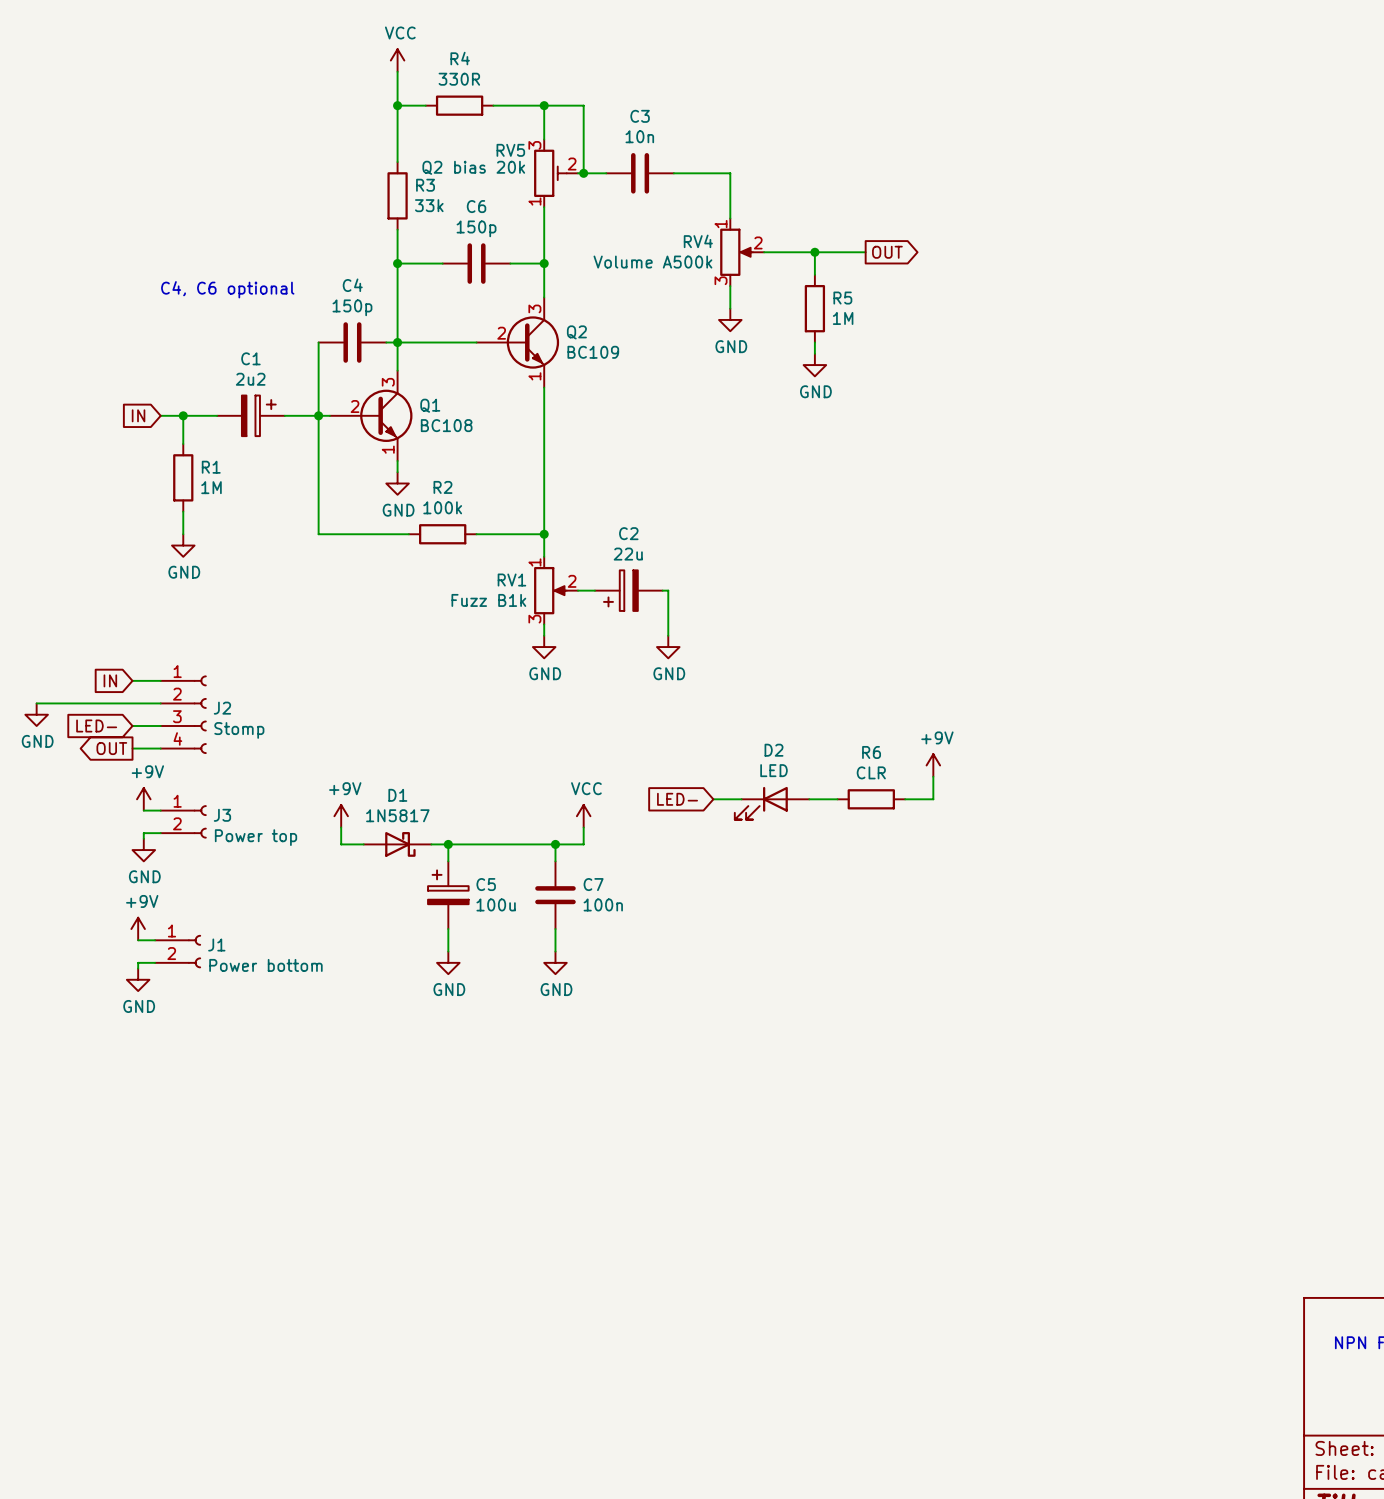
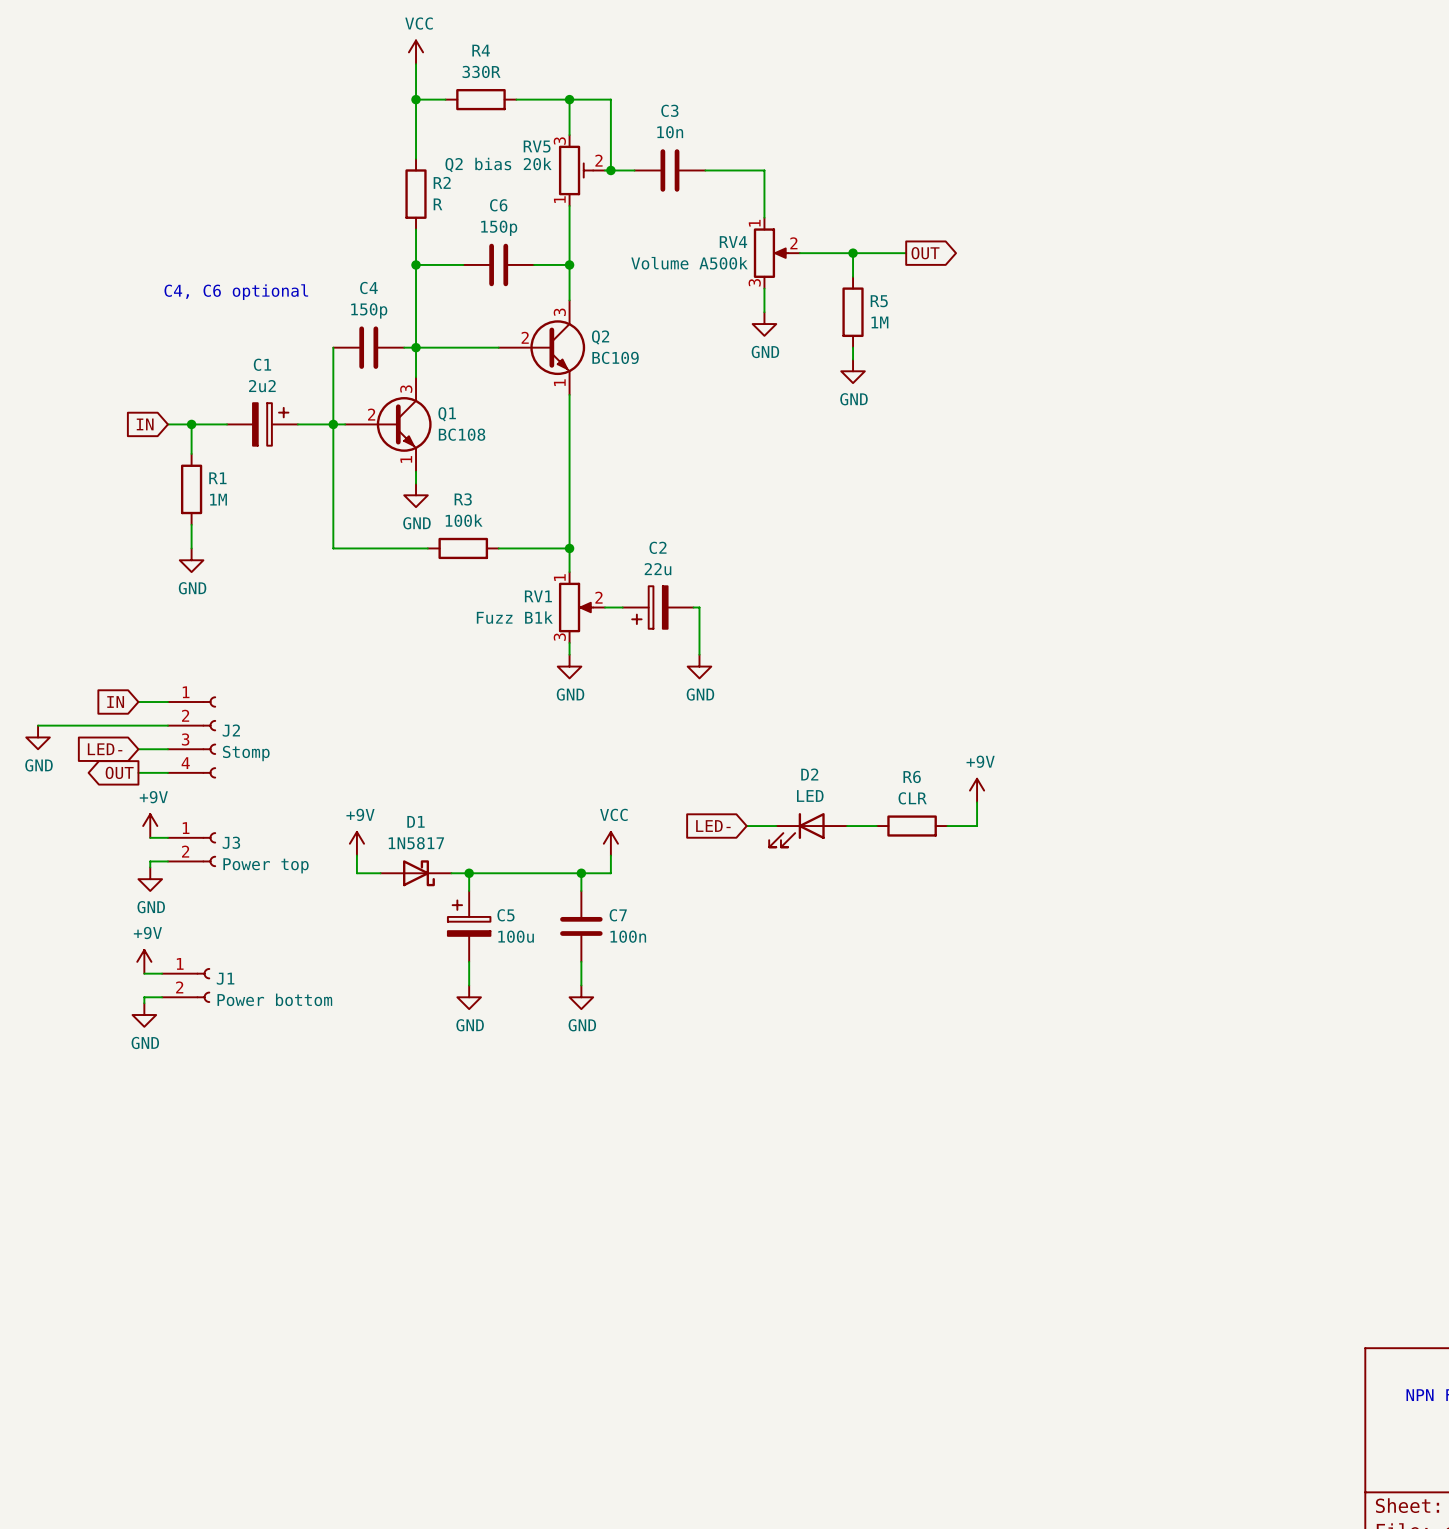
R3 name: R3 (425, 185) -> R2 (442, 182)
R3 value: 33k (429, 205) -> R (437, 204)
R2 name: R2 (442, 487) -> R3 (463, 499)

